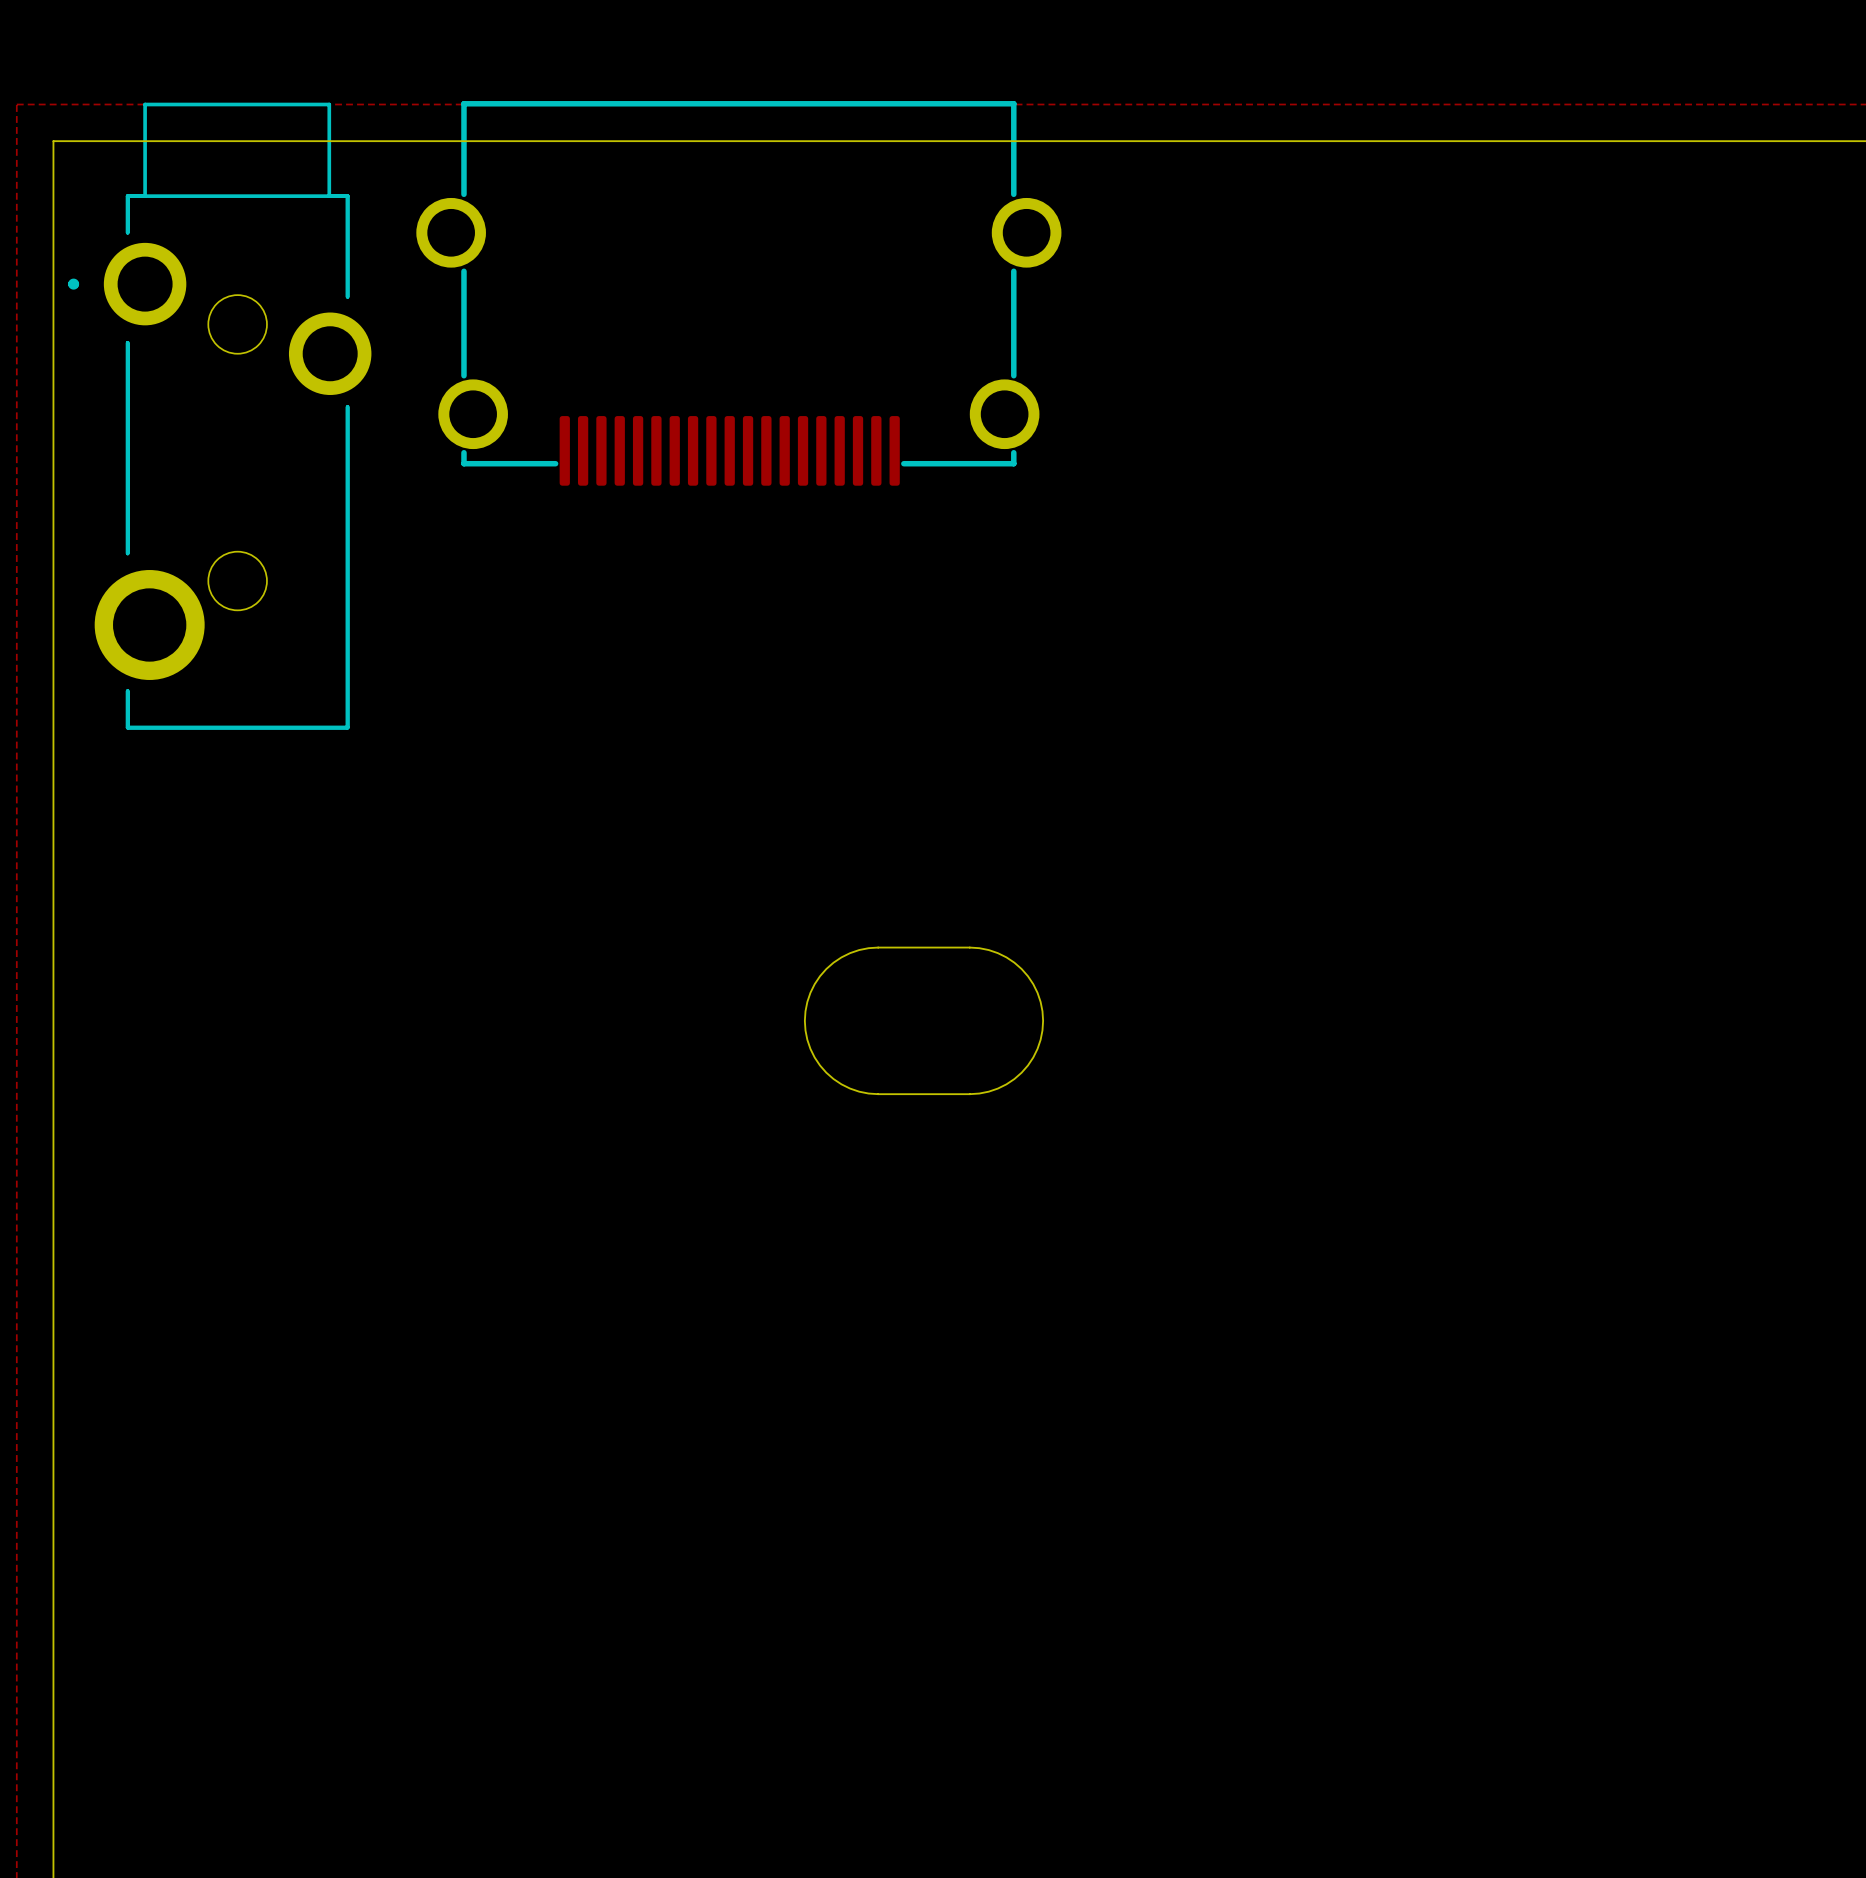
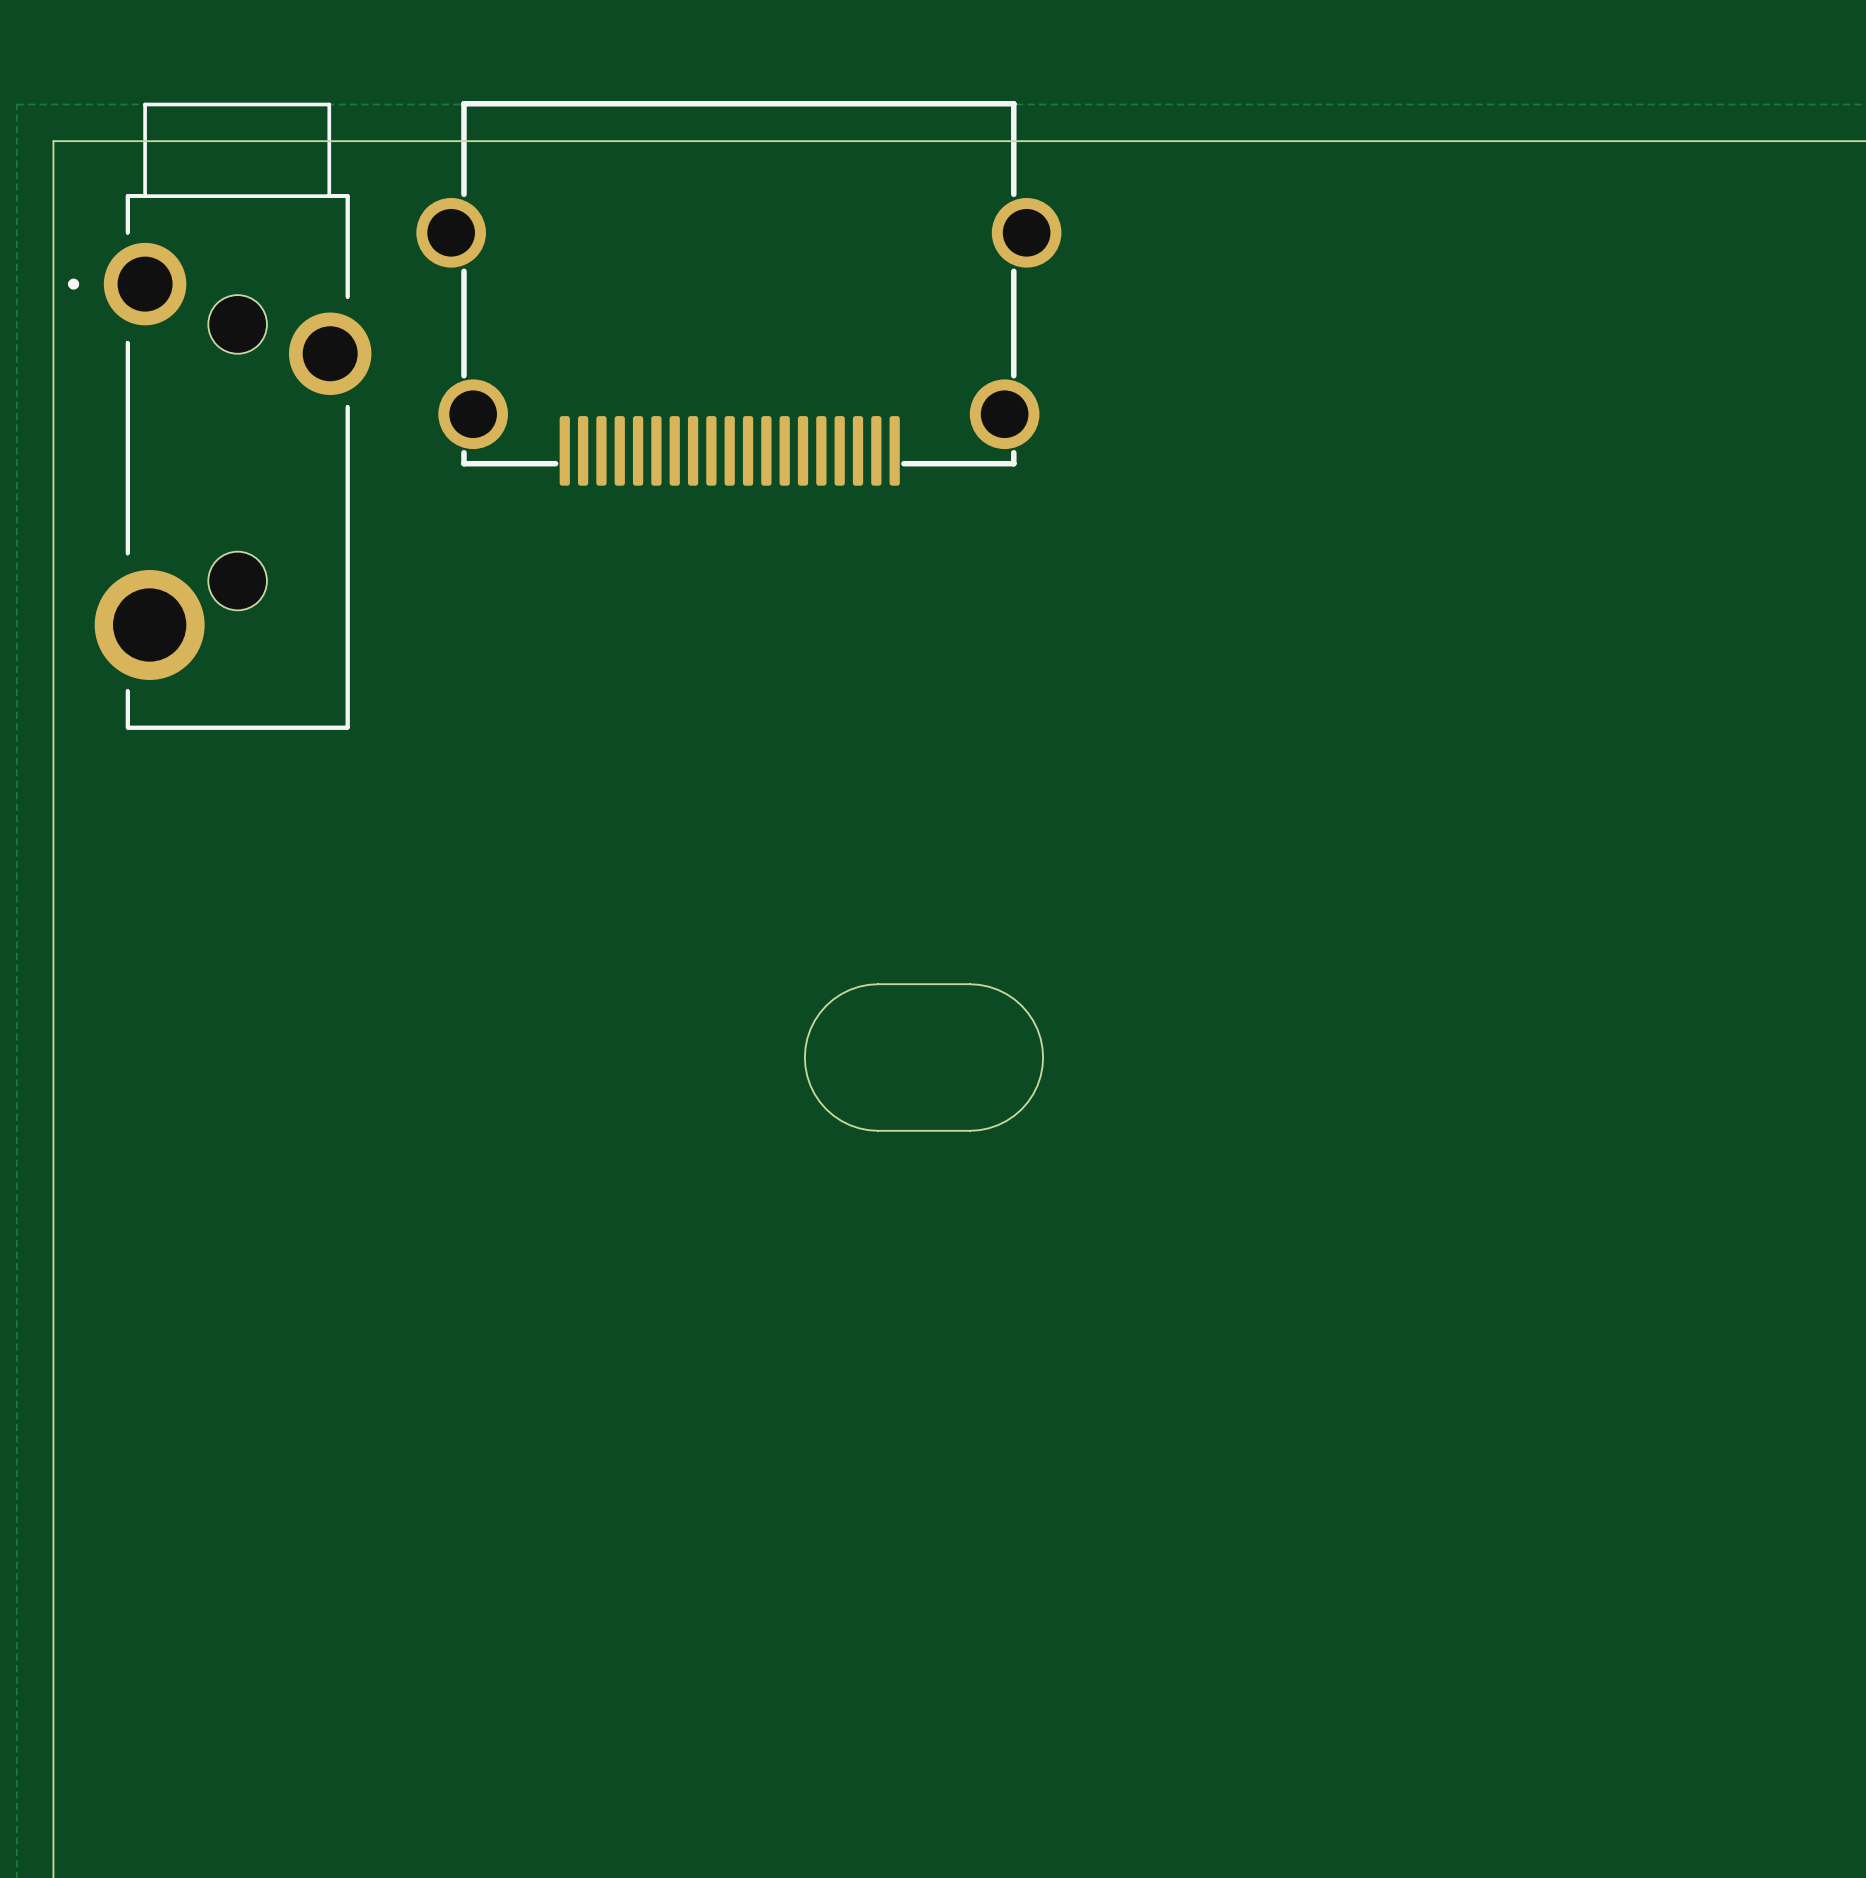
board edge: (878, 947) (979, 948) (997, 953) (1014, 962) (1033, 984) (1042, 1011) (1040, 1039) (1027, 1065) (1006, 1084) (979, 1093) (868, 1093) (850, 1088) (833, 1079) (814, 1057) (807, 1039) (804, 1020) (810, 992) (820, 976) (833, 962) (859, 950) (878, 947) -> (878, 984) (979, 984) (997, 989) (1014, 999) (1033, 1020) (1042, 1047) (1040, 1076) (1027, 1102) (1006, 1121) (979, 1130) (868, 1130) (850, 1125) (833, 1115) (814, 1094) (807, 1076) (804, 1057) (810, 1029) (820, 1012) (833, 999) (859, 986) (878, 984)

